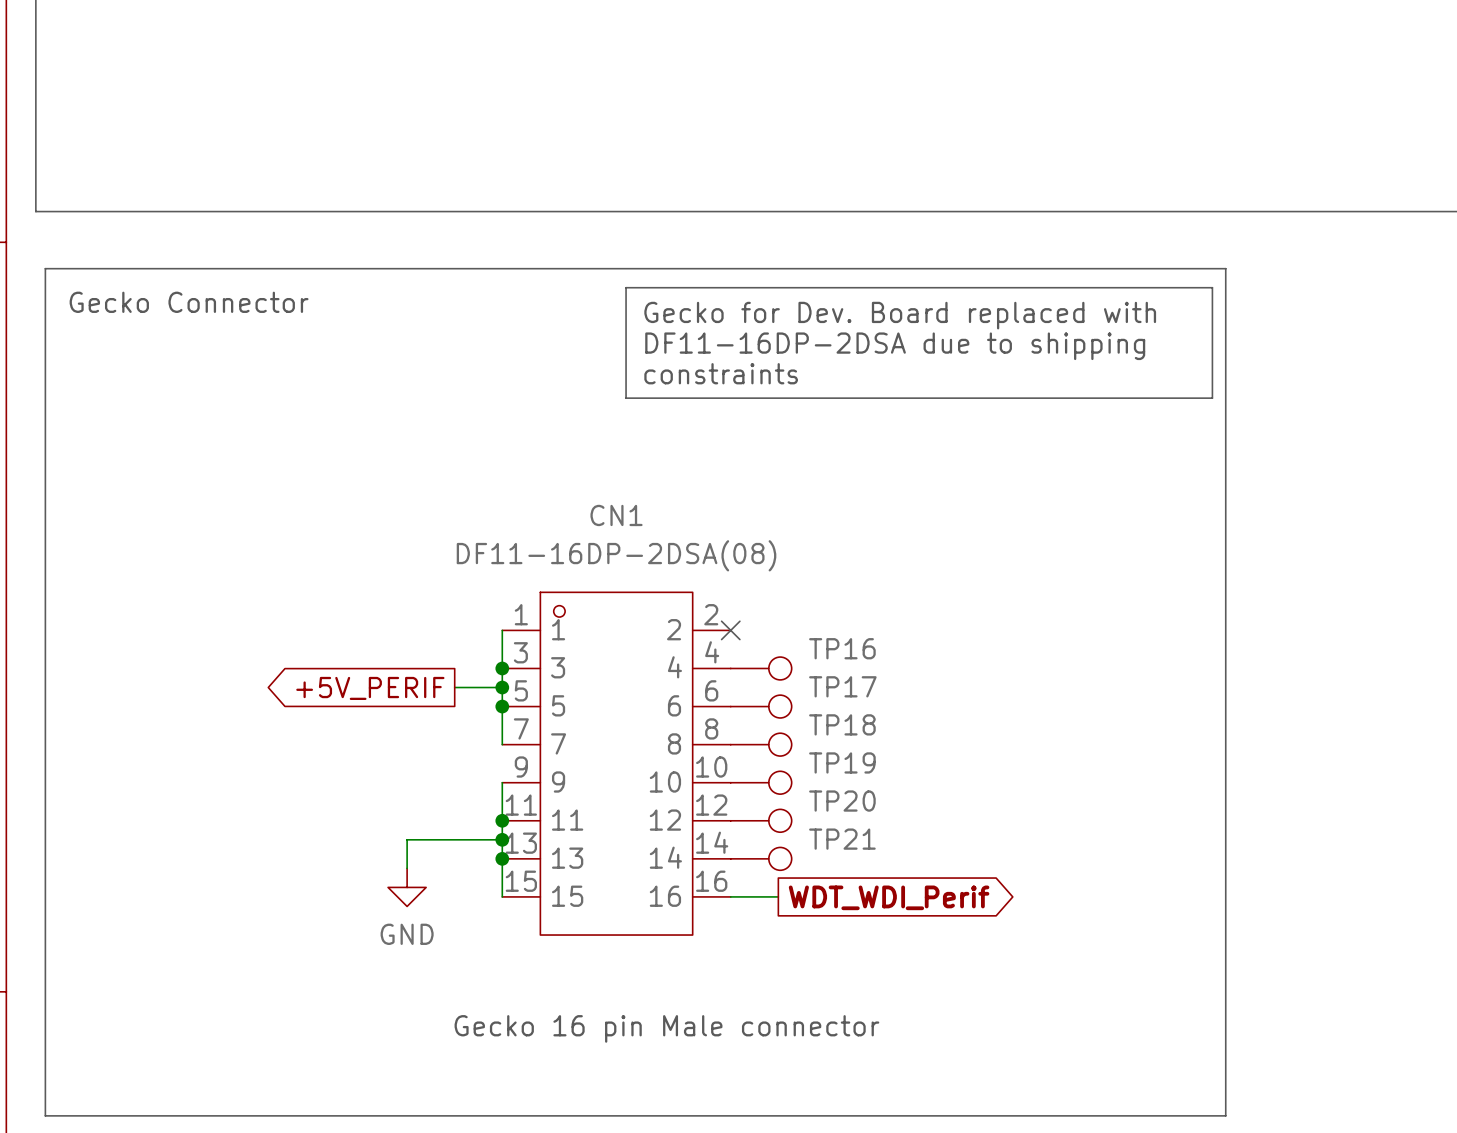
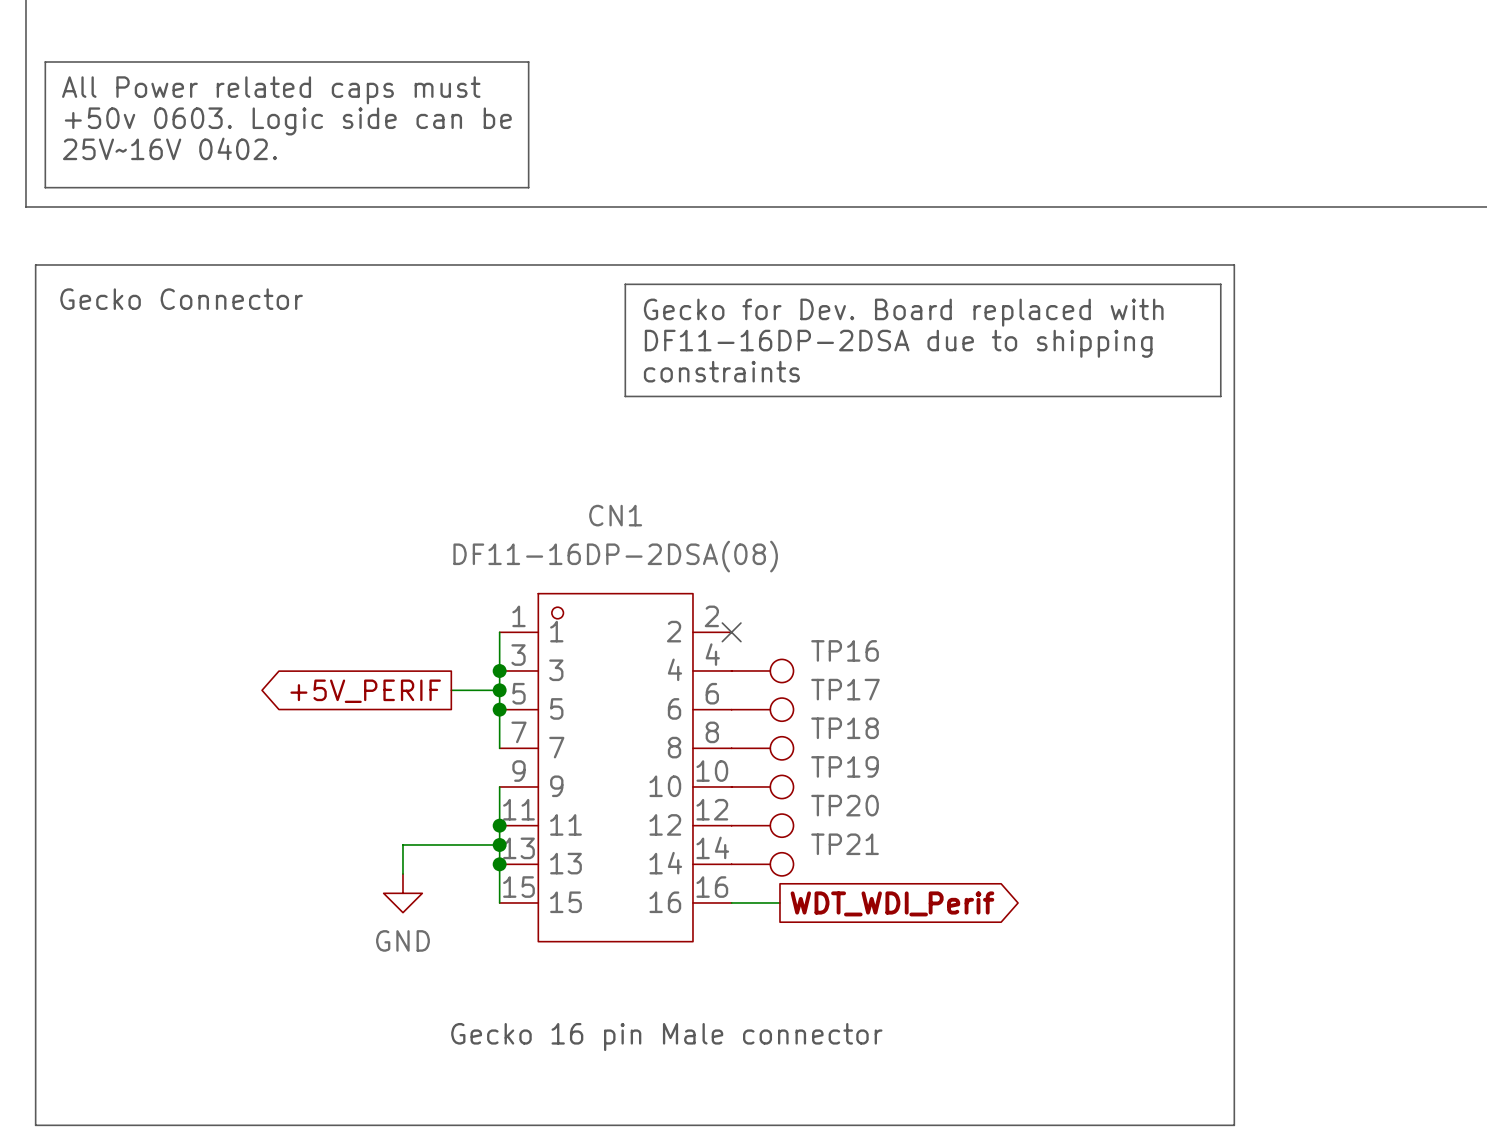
line: none -> (45, 61) (528, 61) (528, 187) (45, 187) (45, 61)
text: none -> All Power related caps must (271, 90)
text: none -> +50v 0603. Logic side can be (288, 121)
text: none -> 25V~16V 0402. (169, 148)

